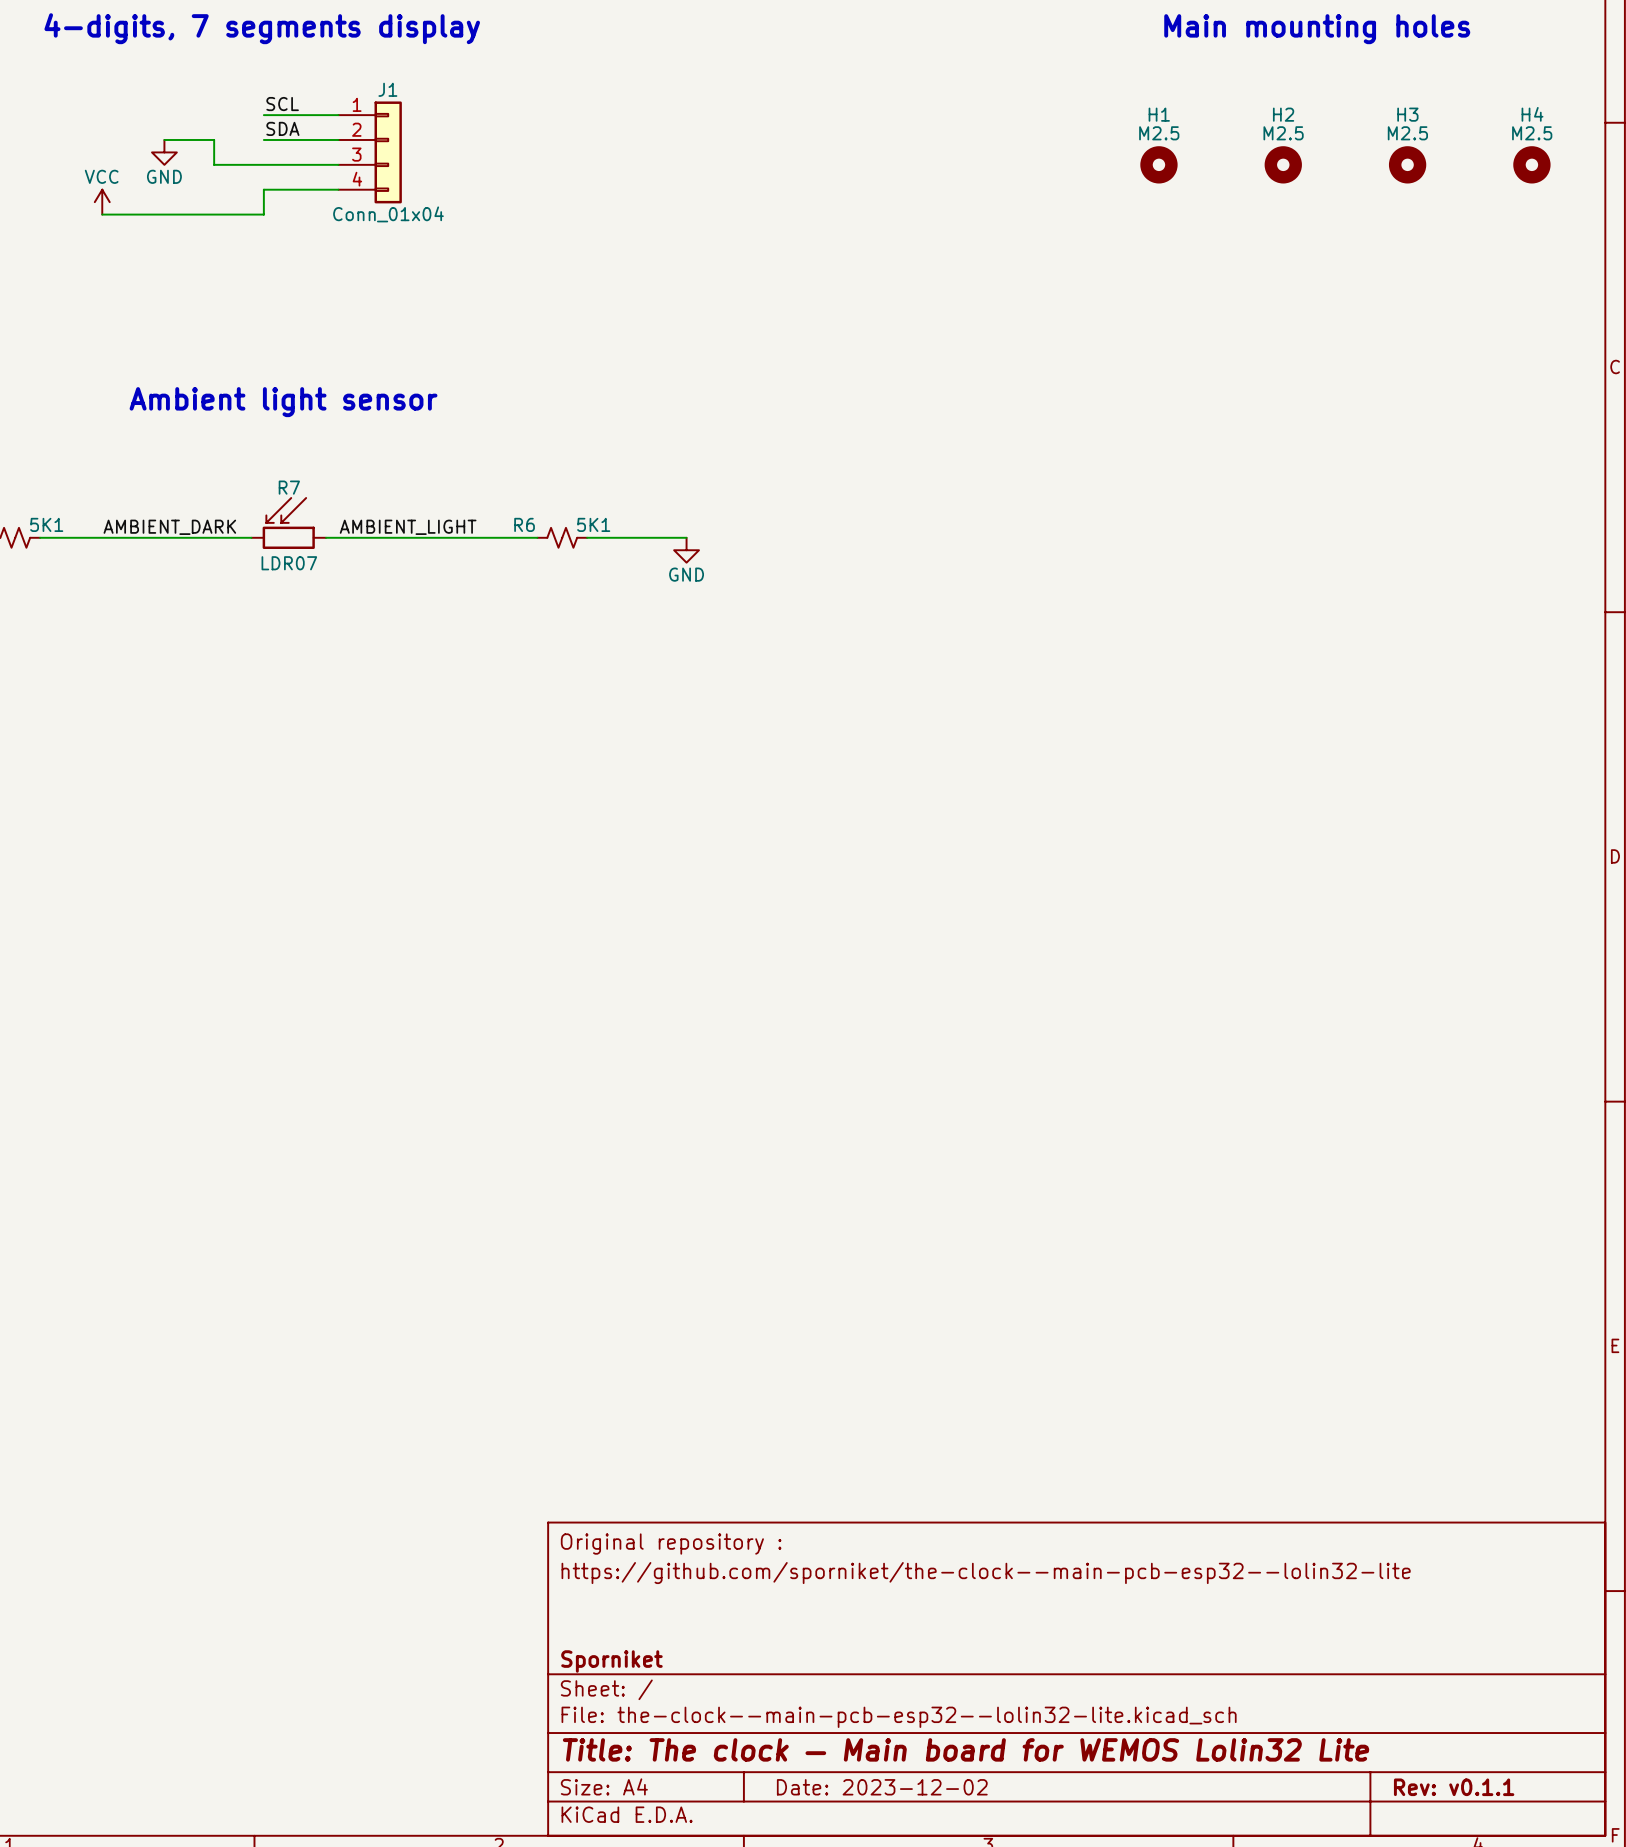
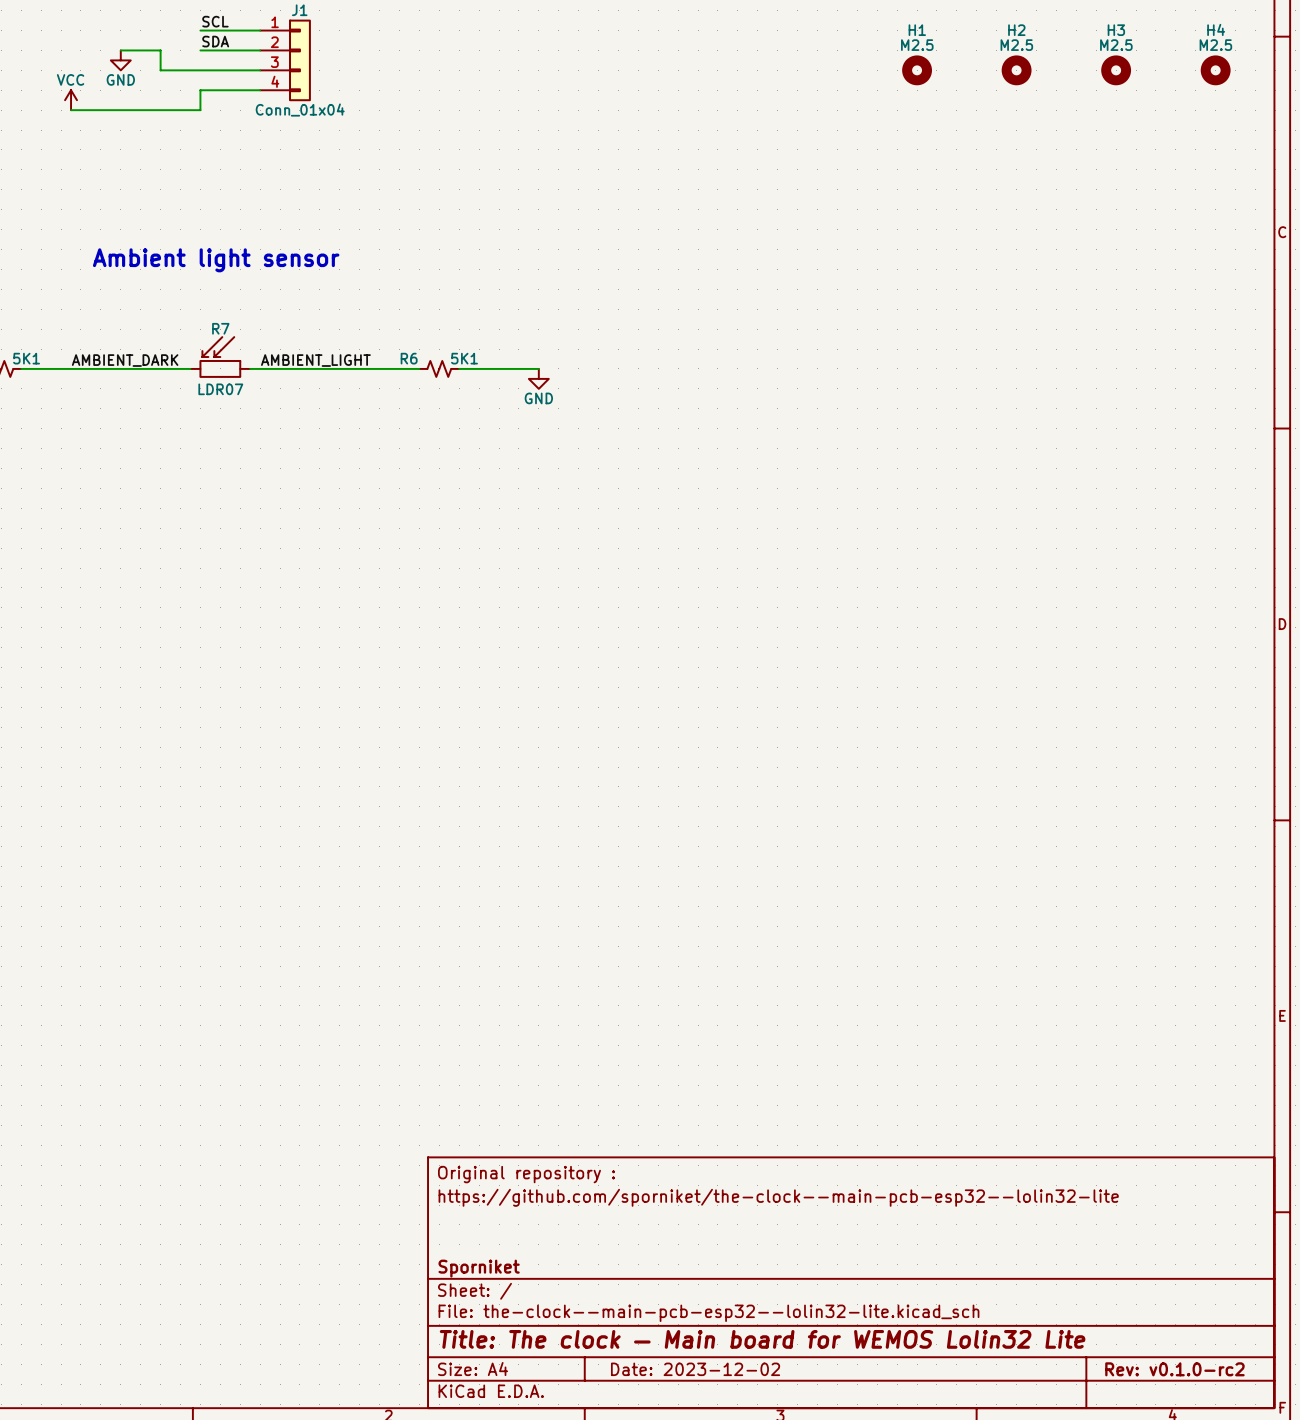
title block: Rev: v0.1.1 (1454, 1787) -> Rev: v0.1.0-rc2 (1174, 1369)

